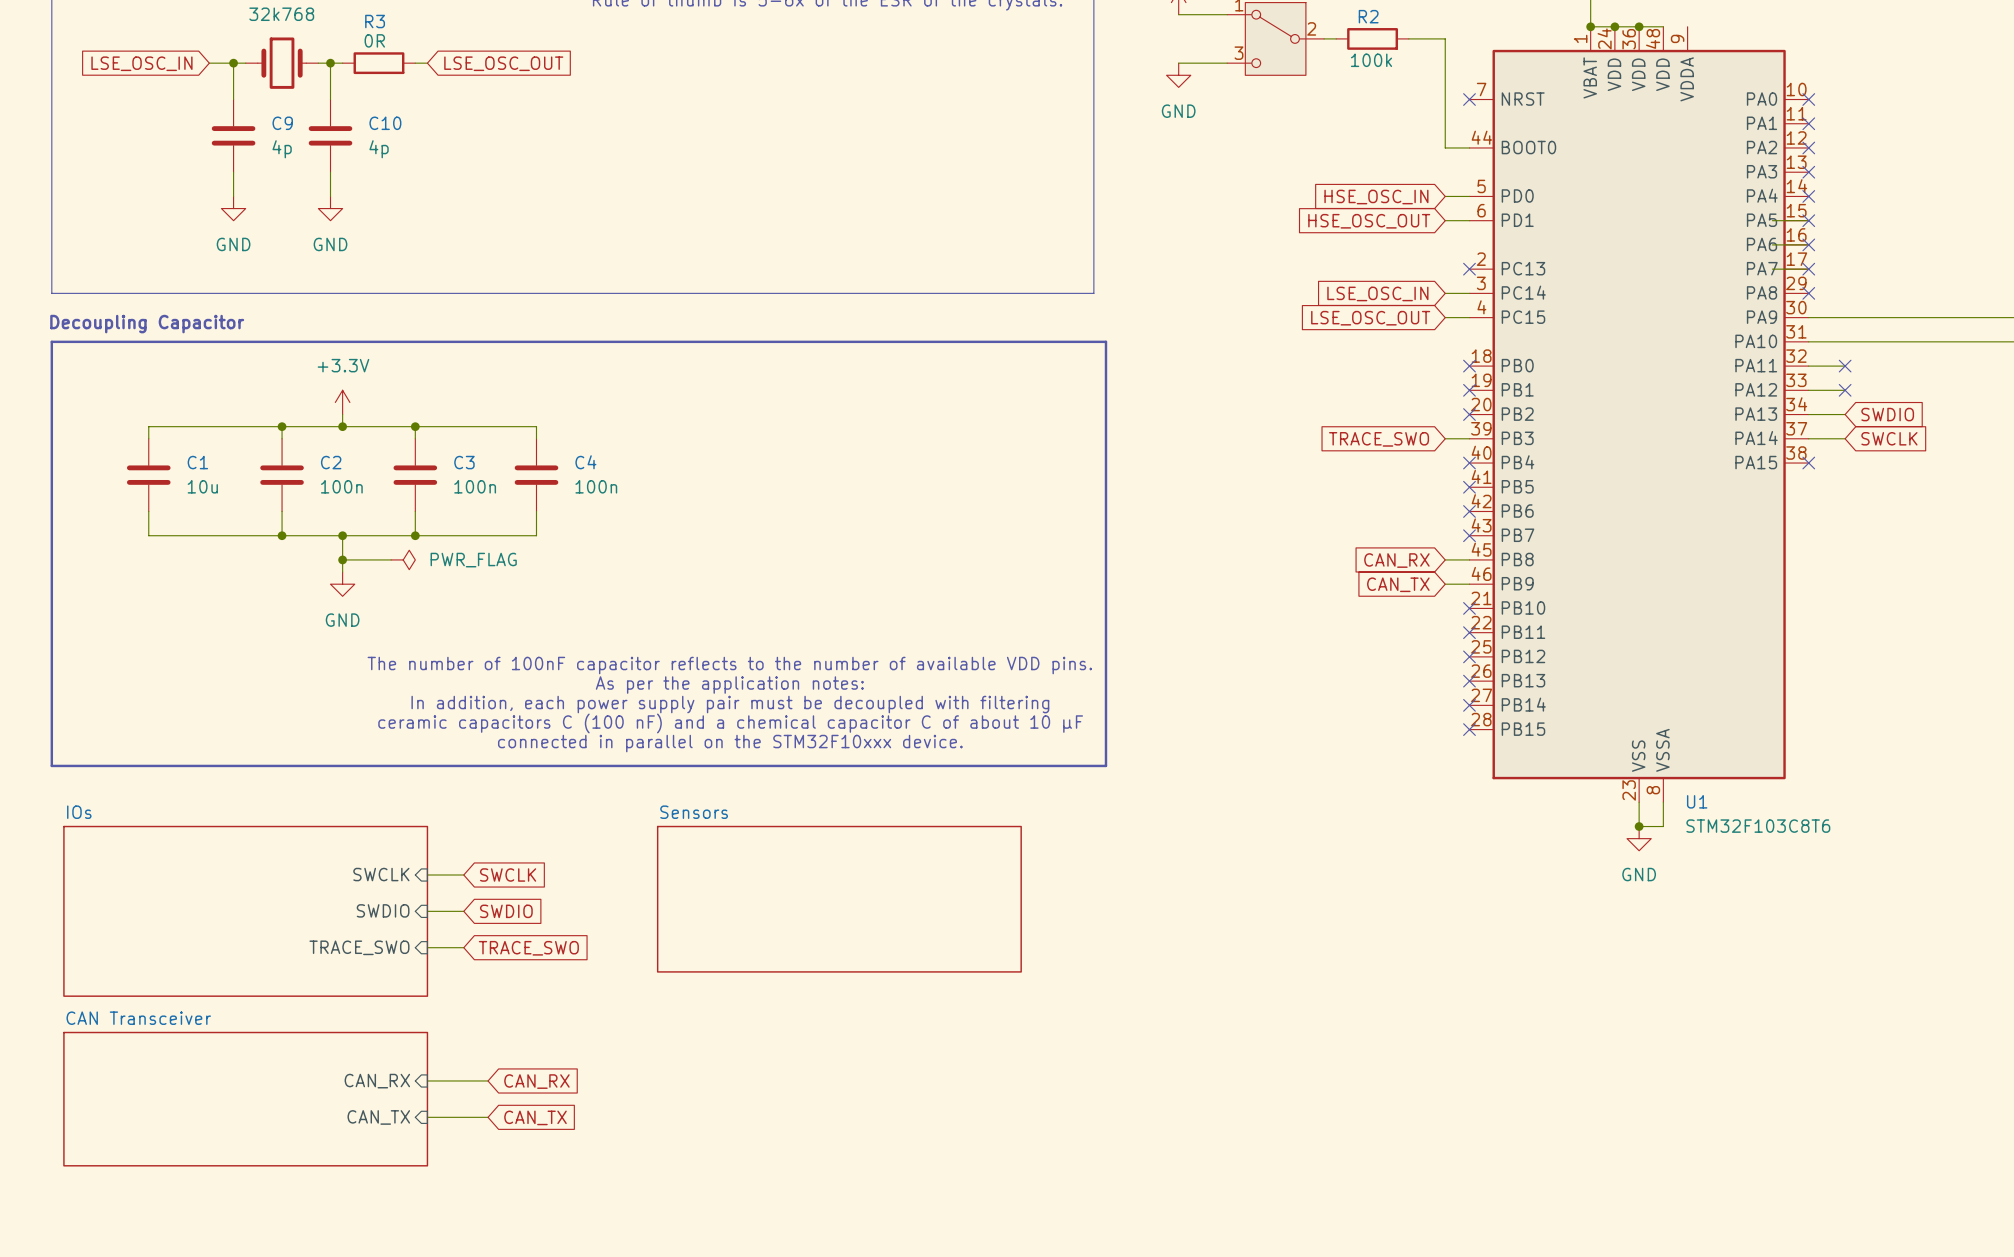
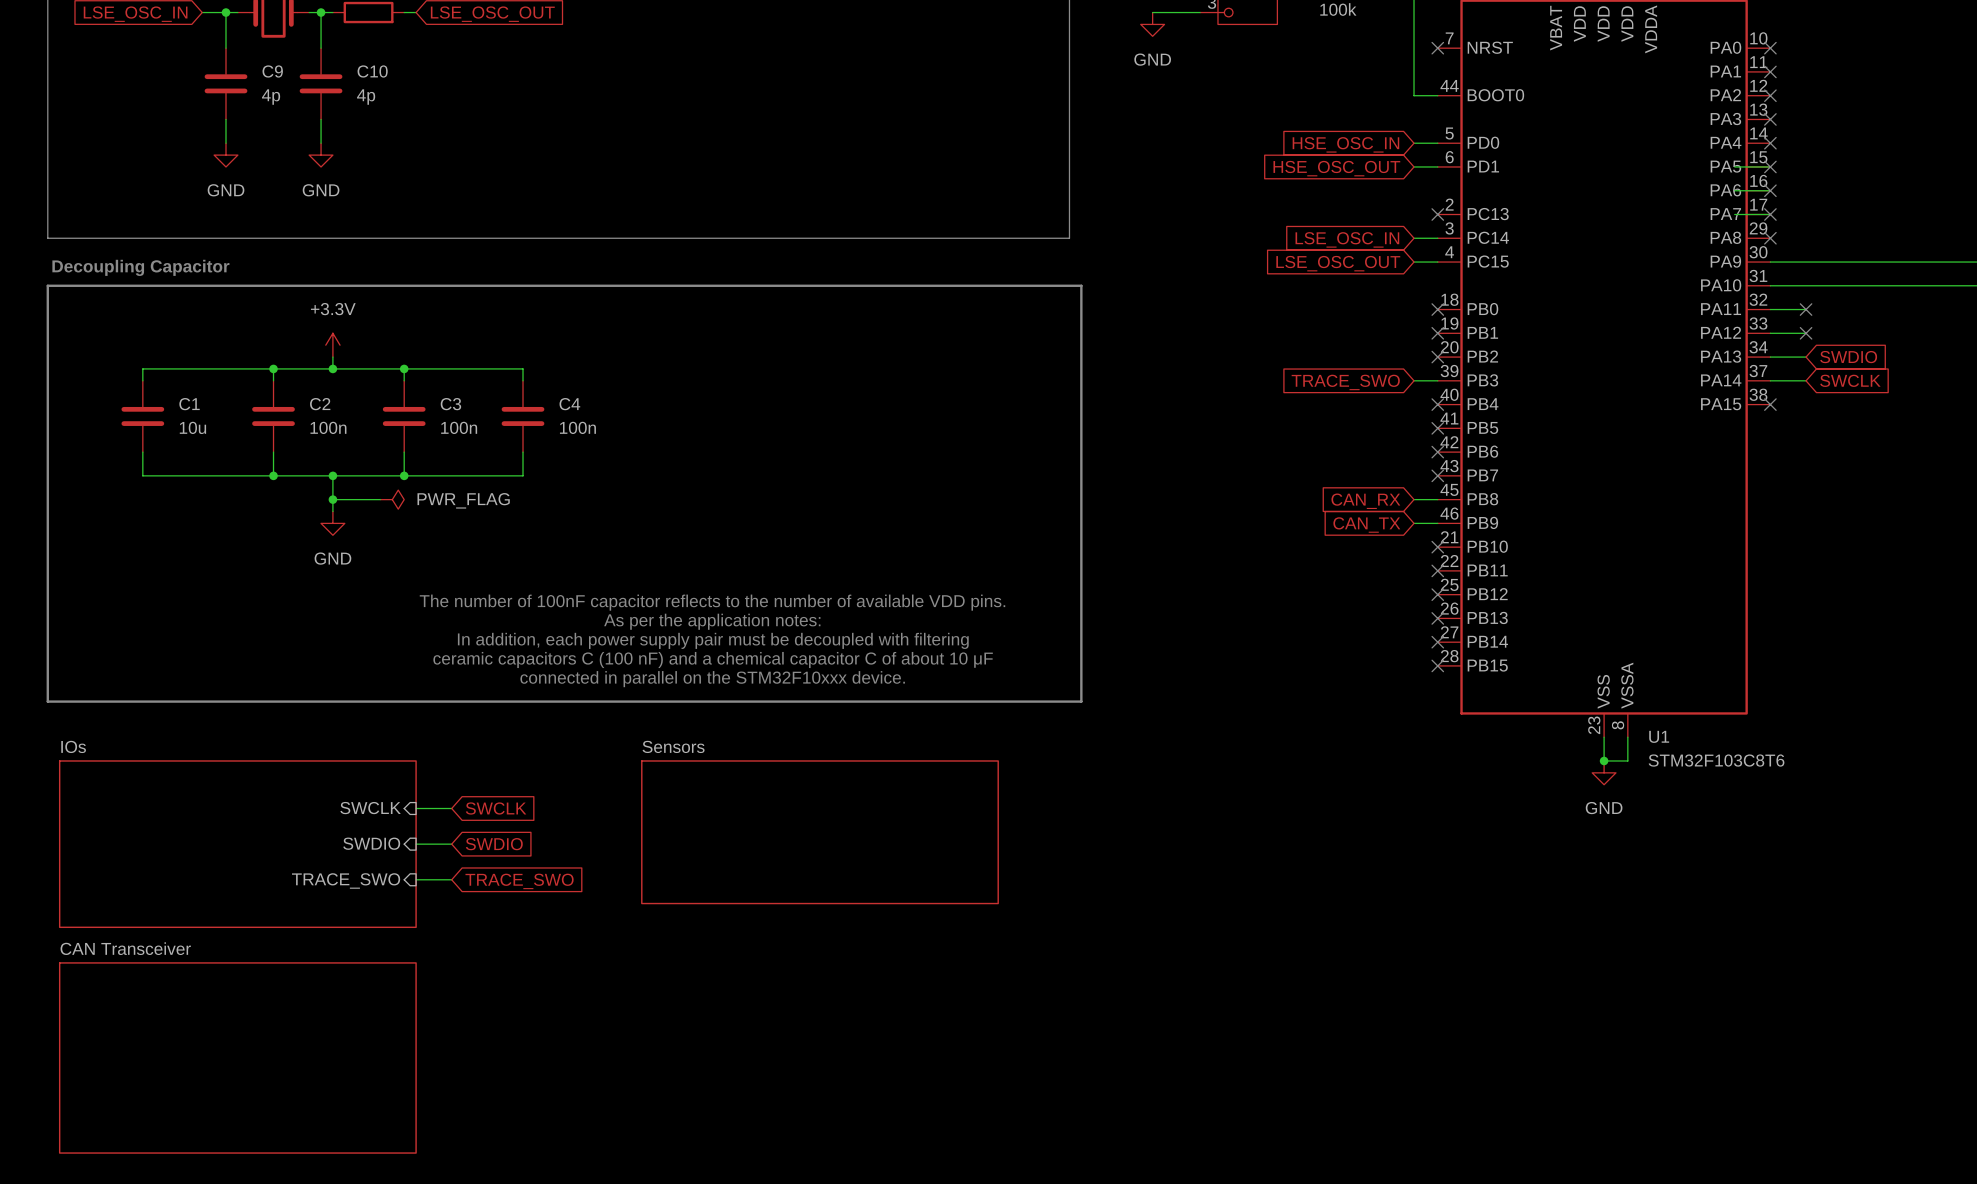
wire: (427, 1080) (488, 1080) -> none
sheet pin: CAN_RX (377, 1081) -> none
global label: CAN_RX (536, 1081) -> none
sheet CAN Transceiver: (245, 1099) -> none
sheet pin: CAN_TX (378, 1117) -> none
wire: (427, 1117) (488, 1117) -> none
global label: CAN_TX (535, 1117) -> none
sheet CAN Transceiver: none -> (237, 1057)

